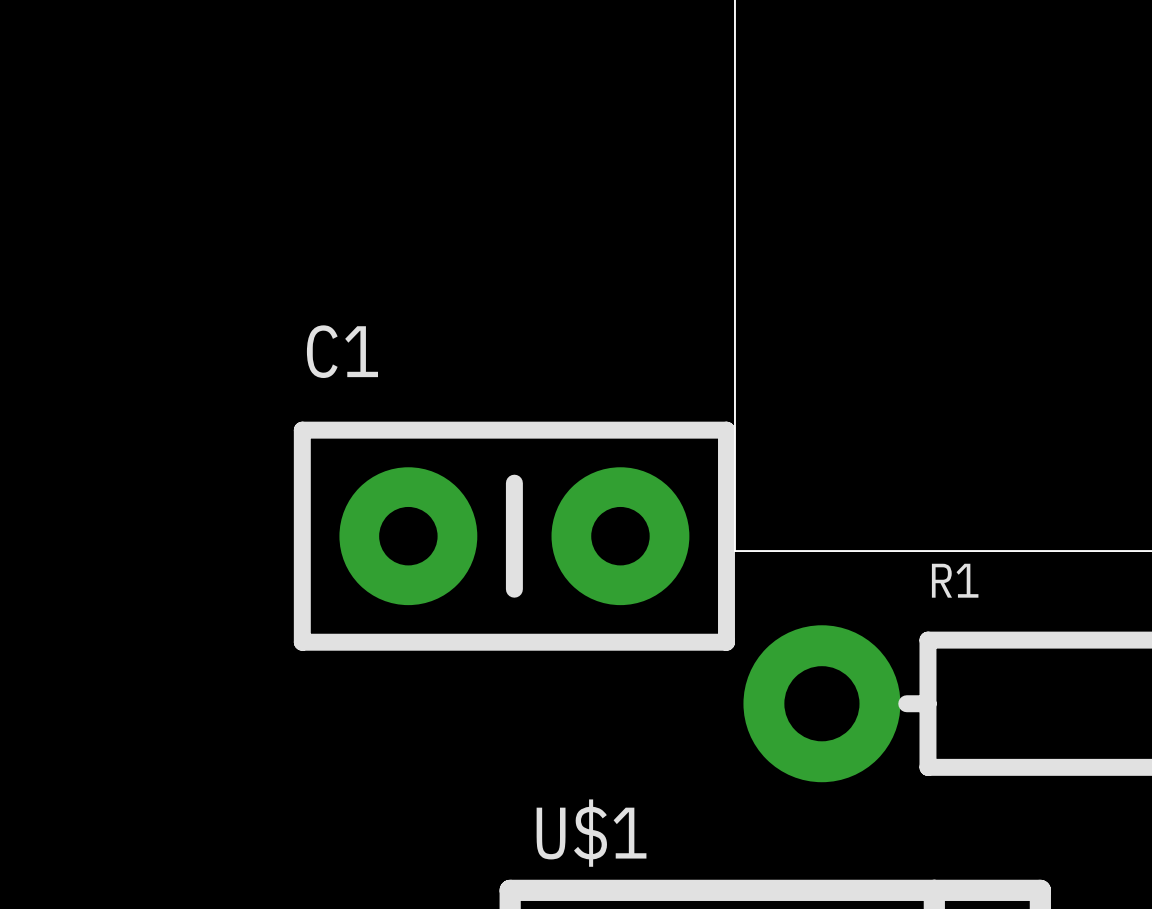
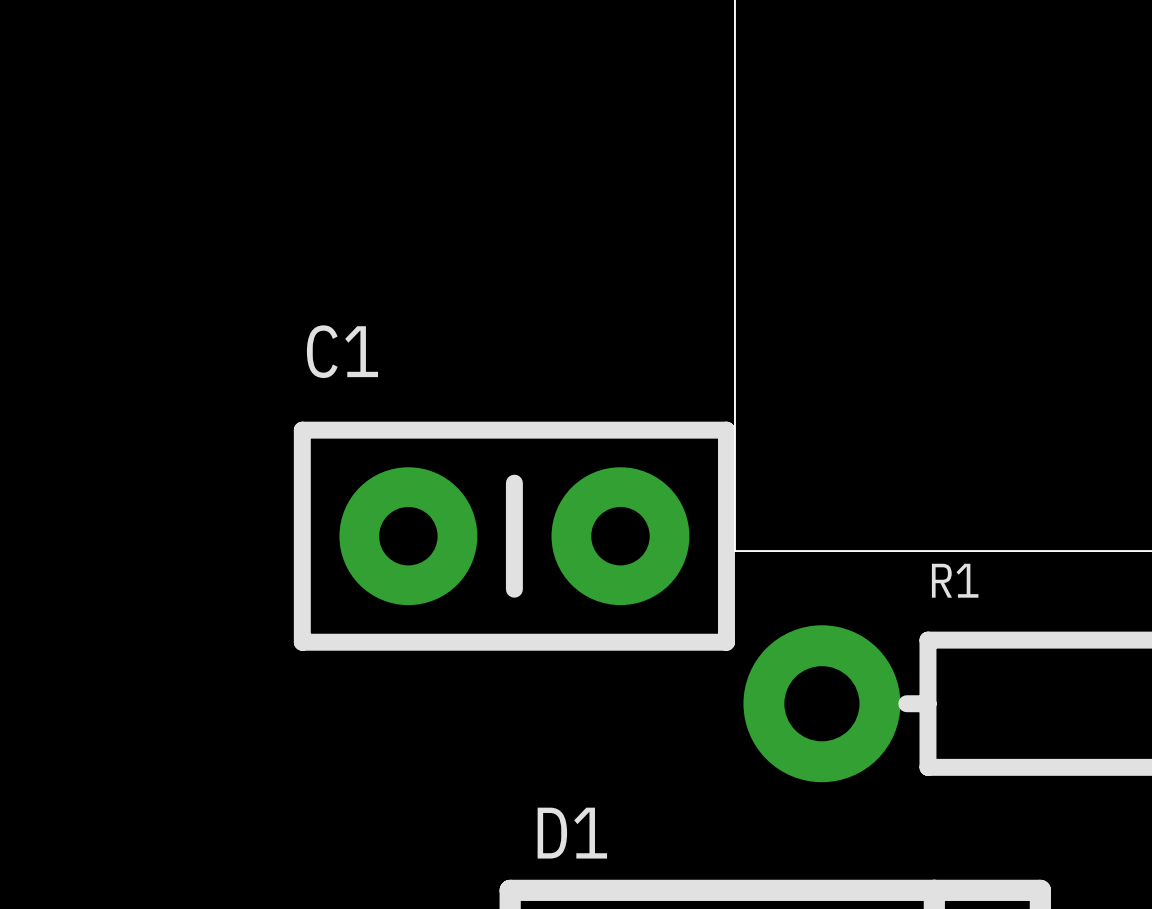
U$1 name: U$1 (591, 833) -> D1 (572, 833)

